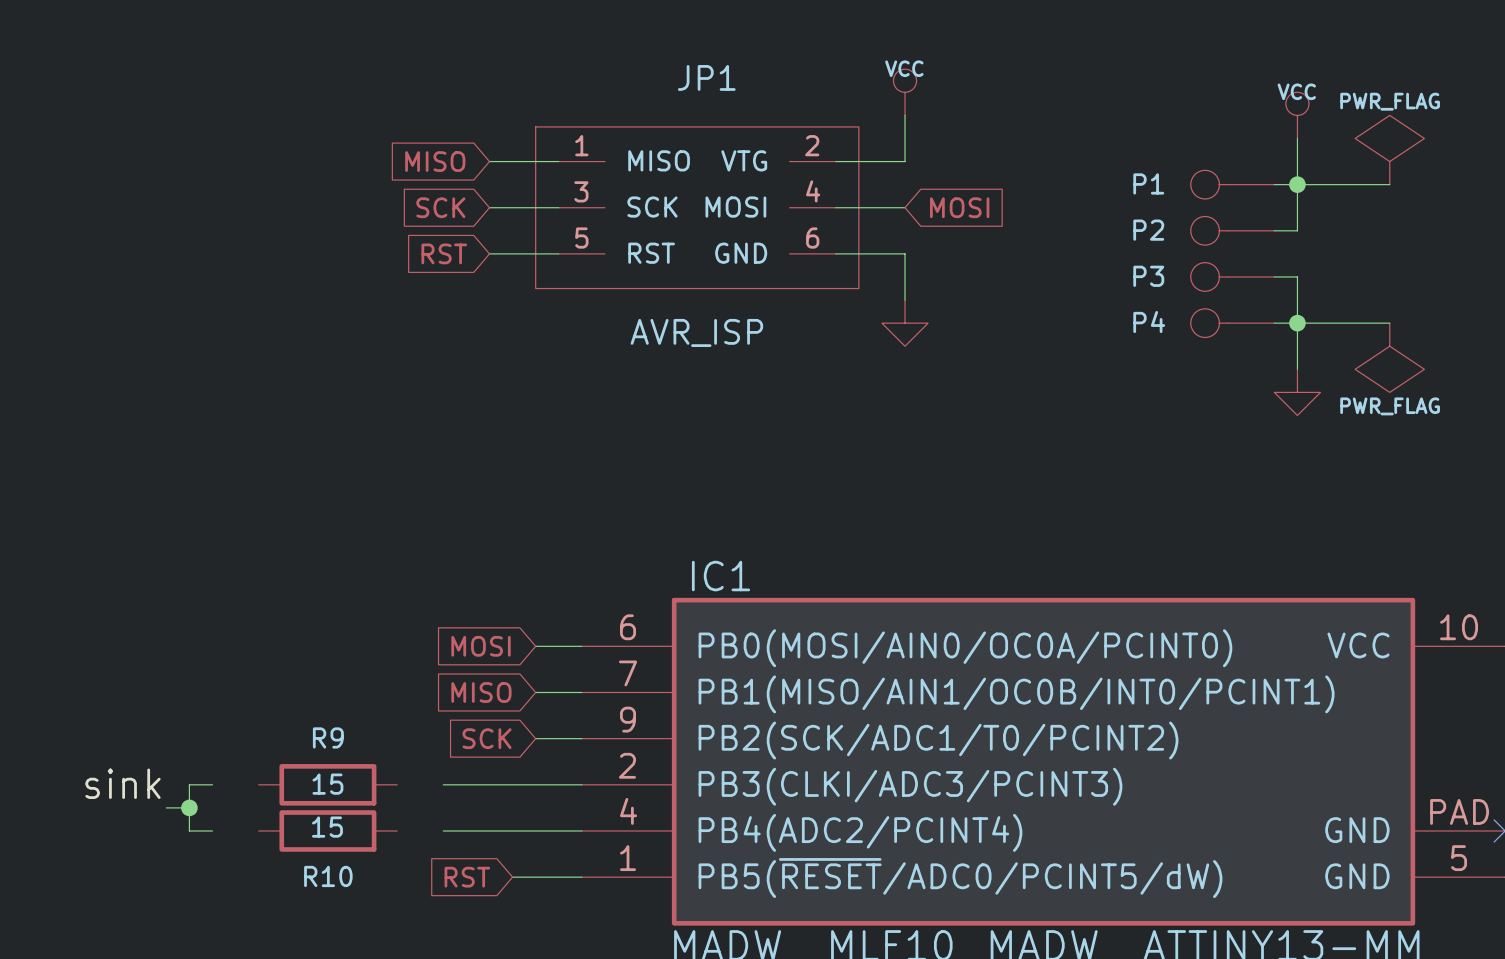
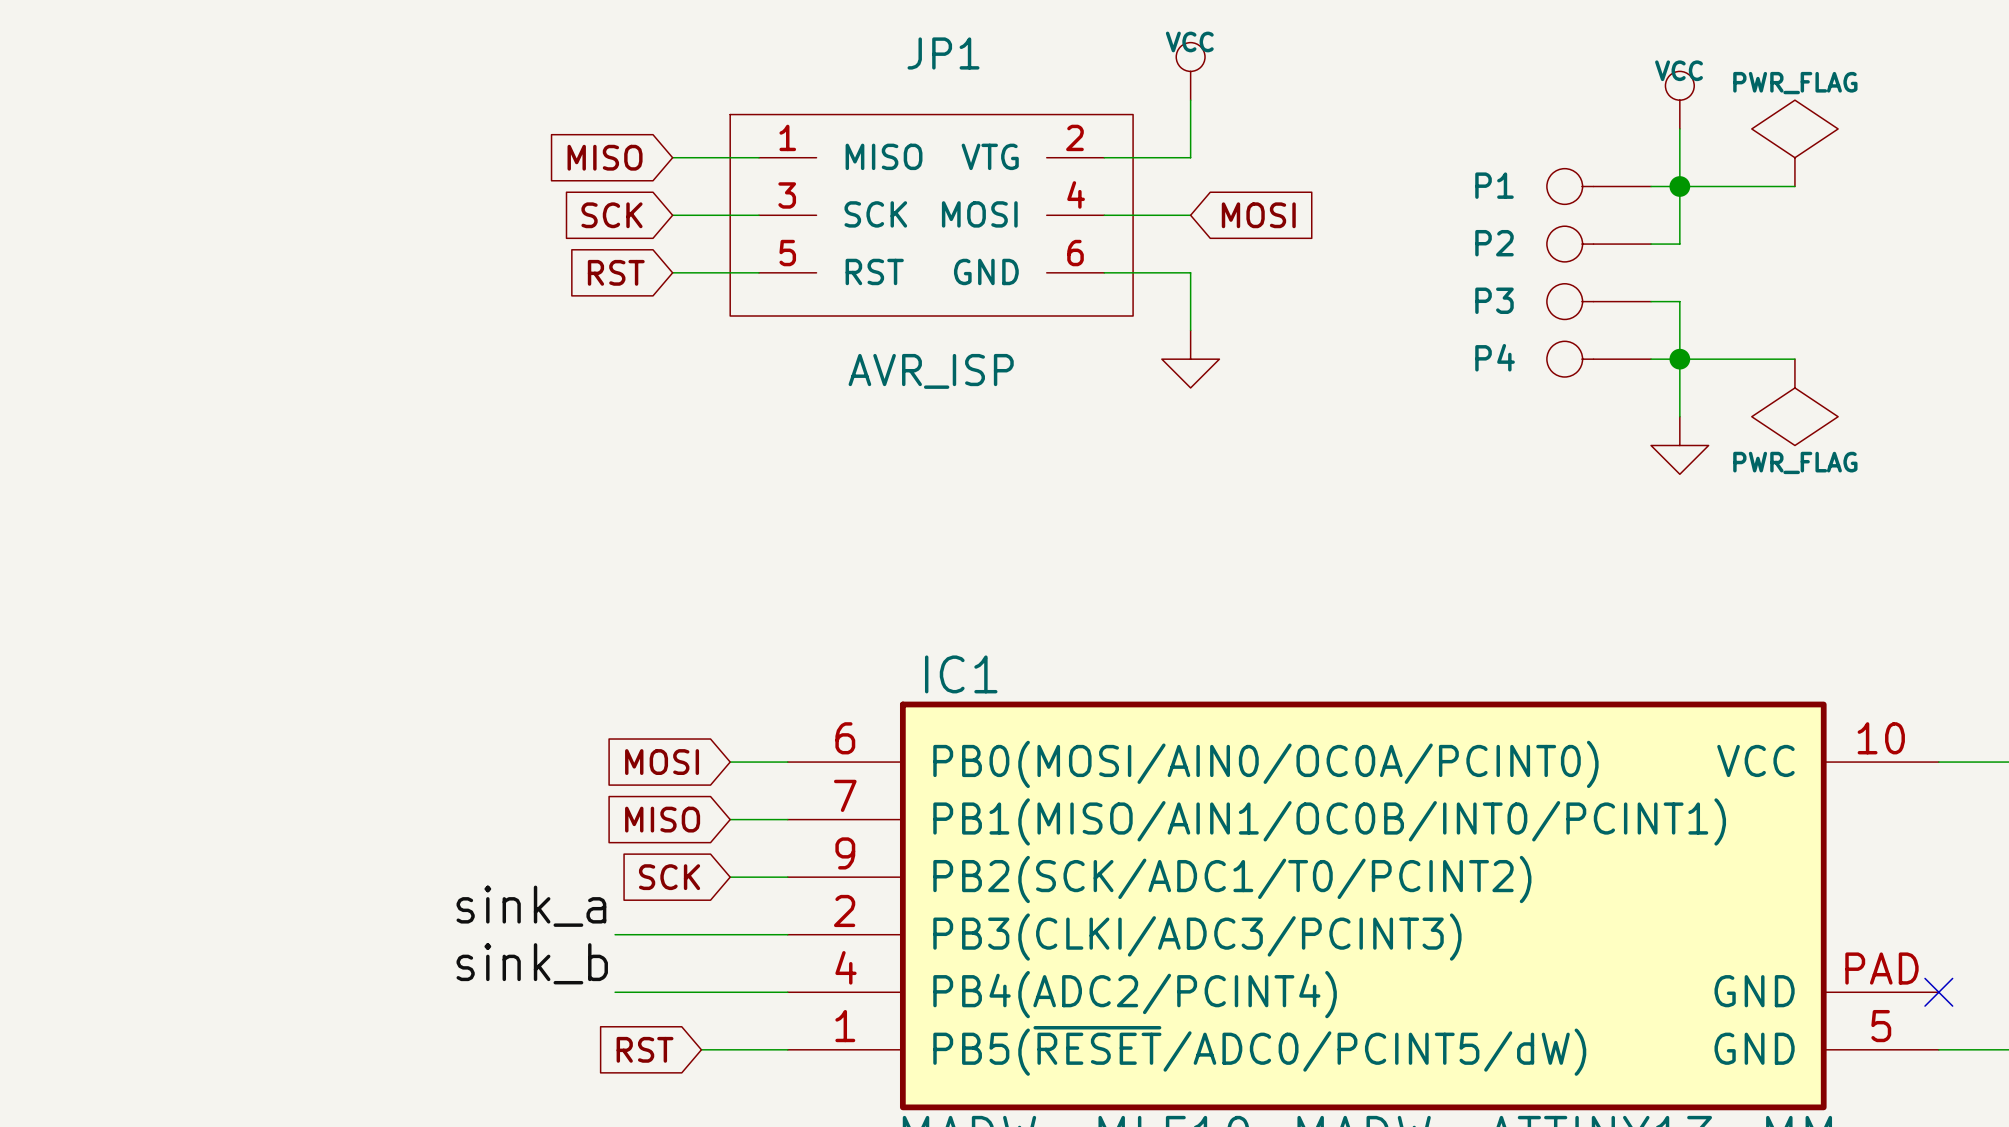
label: none -> sink_a (531, 906)
label: sink (122, 783) -> none
wire: (212, 784) (189, 784) (189, 830) (212, 830) -> none
R9: 15 (327, 784) -> none
wire: (166, 807) (189, 807) -> none
junction: (189, 807) -> none
label: none -> sink_b (532, 963)
R10: 15 (327, 830) -> none

